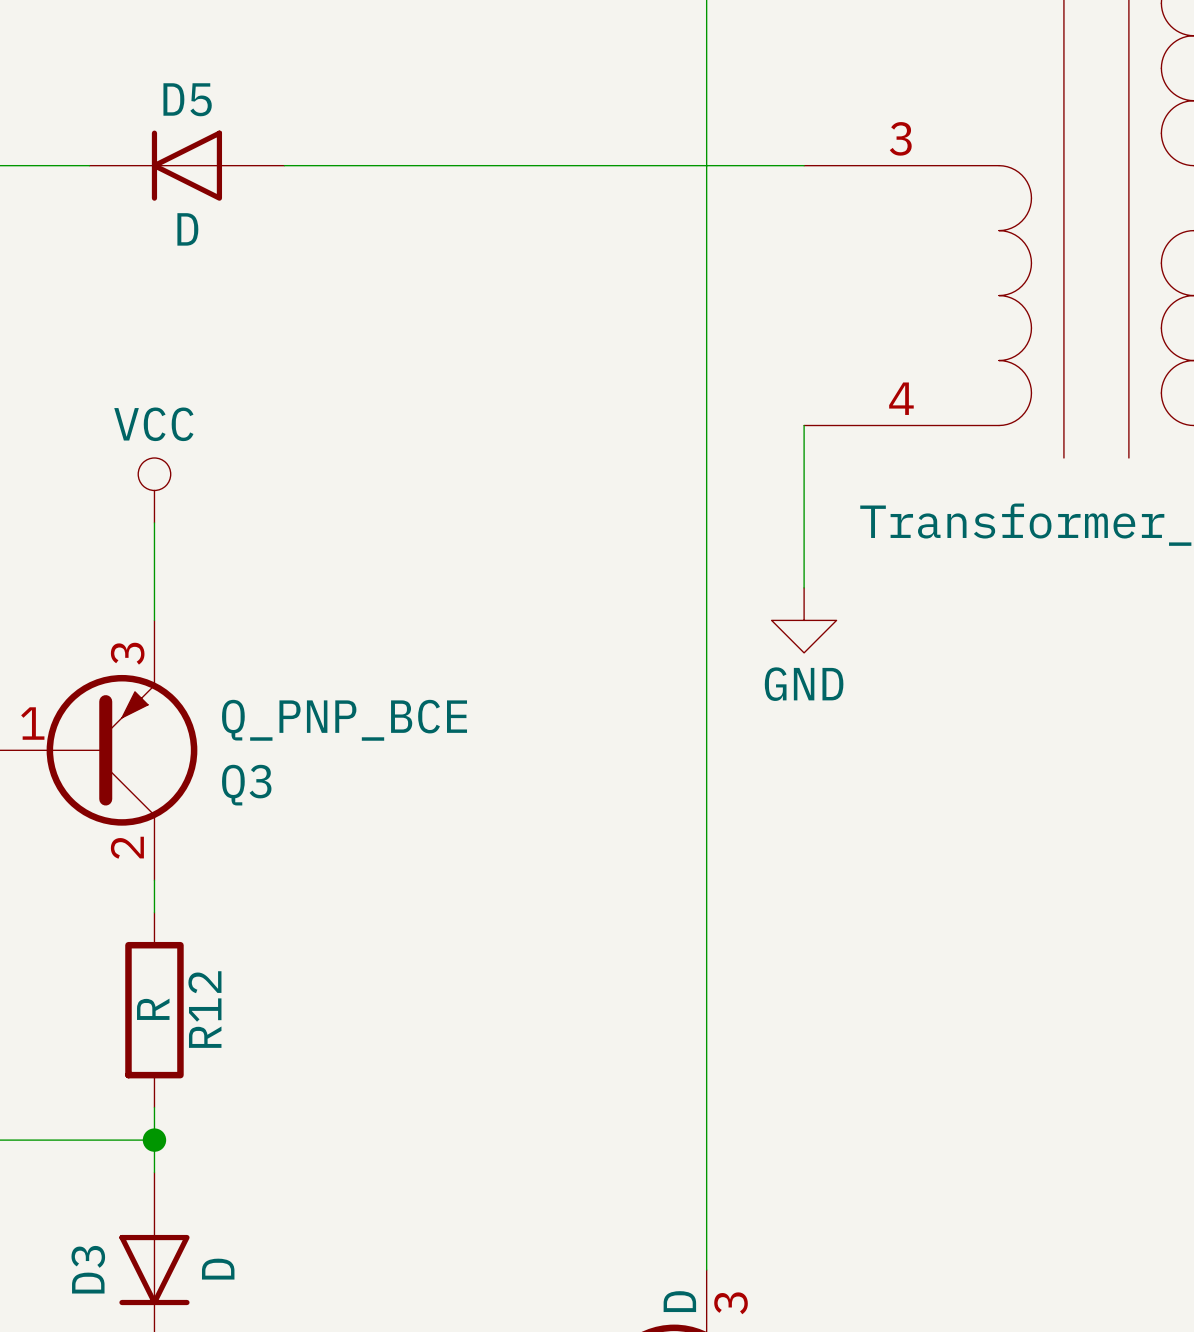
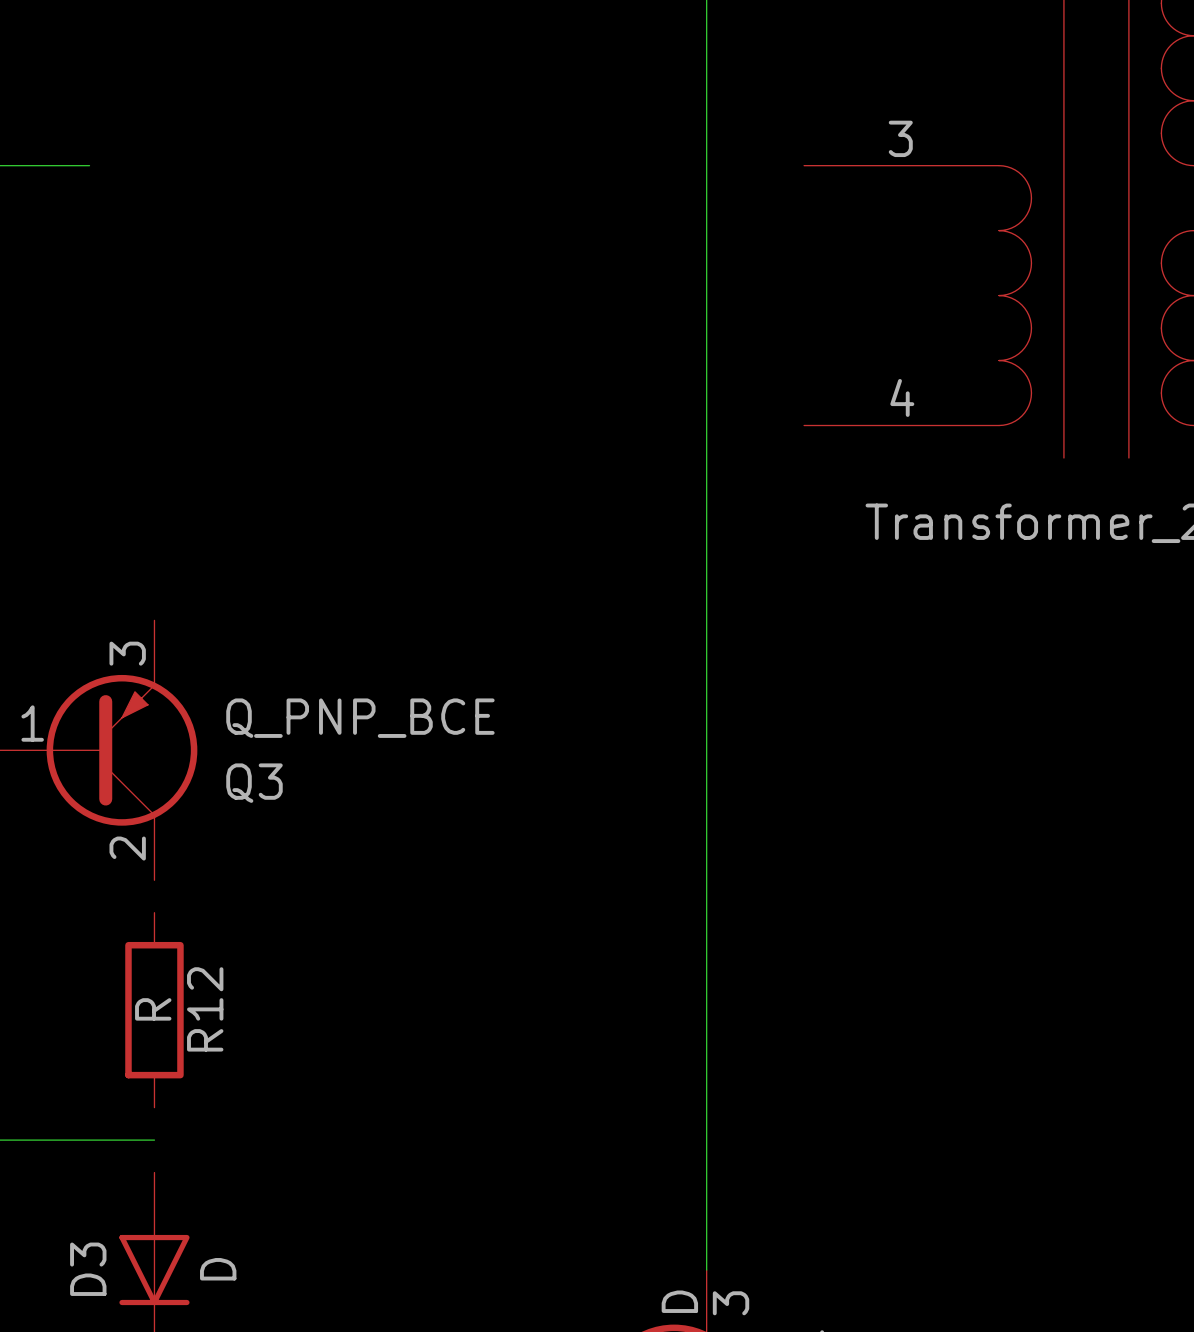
D5: D (186, 165) -> none
wire: (284, 165) (804, 165) -> none
wire: (804, 425) (804, 587) -> none
power symbol: VCC (154, 490) -> none
wire: (154, 522) (154, 620) -> none
power symbol: GND (804, 620) -> none
wire: (154, 880) (154, 912) -> none
wire: (154, 1107) (154, 1172) -> none
junction: (154, 1140) -> none

